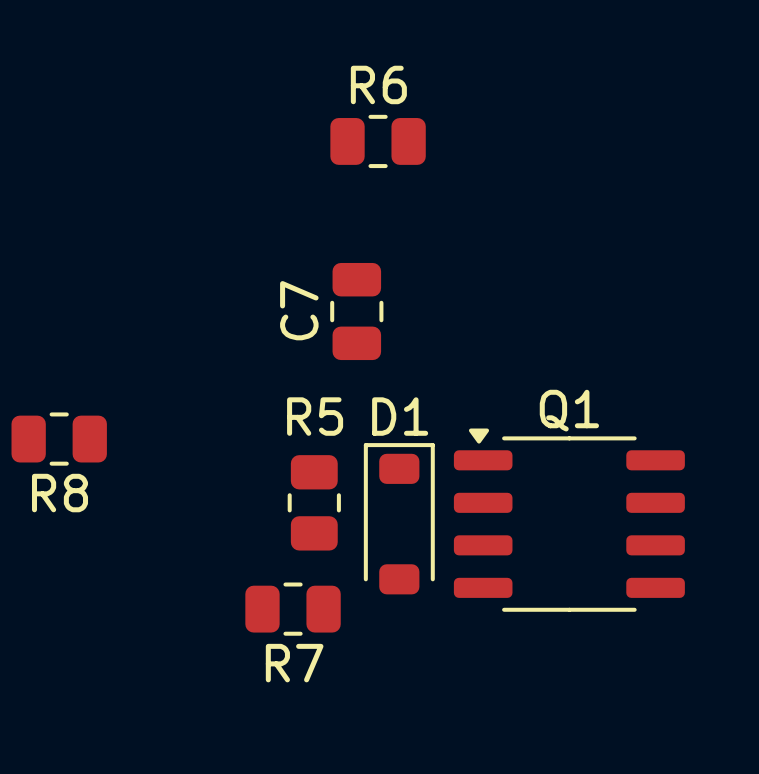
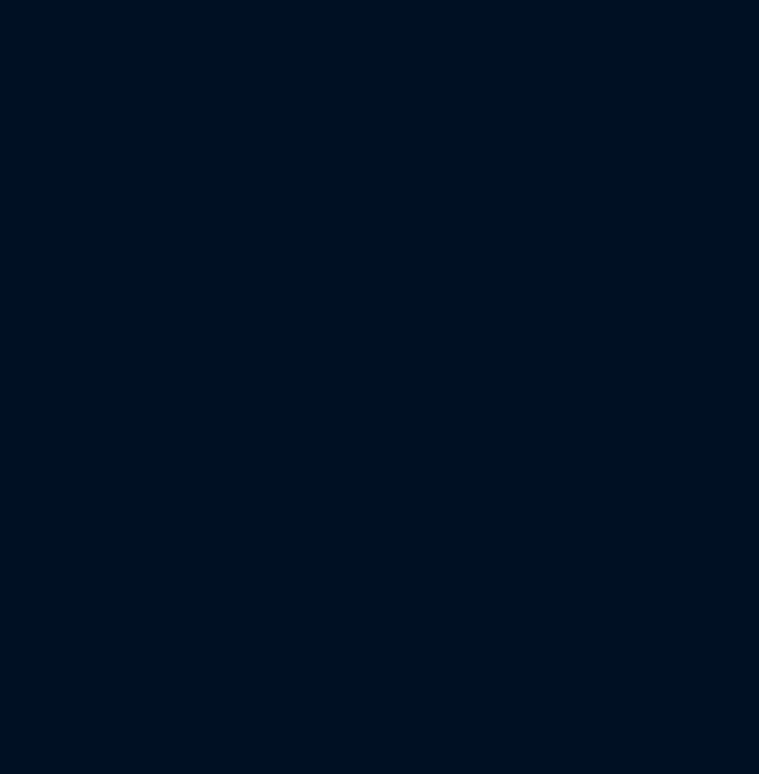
R6: (378, 141) -> none
C7: (356, 311) -> none
R8: (59, 439) -> none
R5: (314, 502) -> none
D1: (399, 518) -> none
Q1: (569, 520) -> none
R7: (293, 609) -> none

